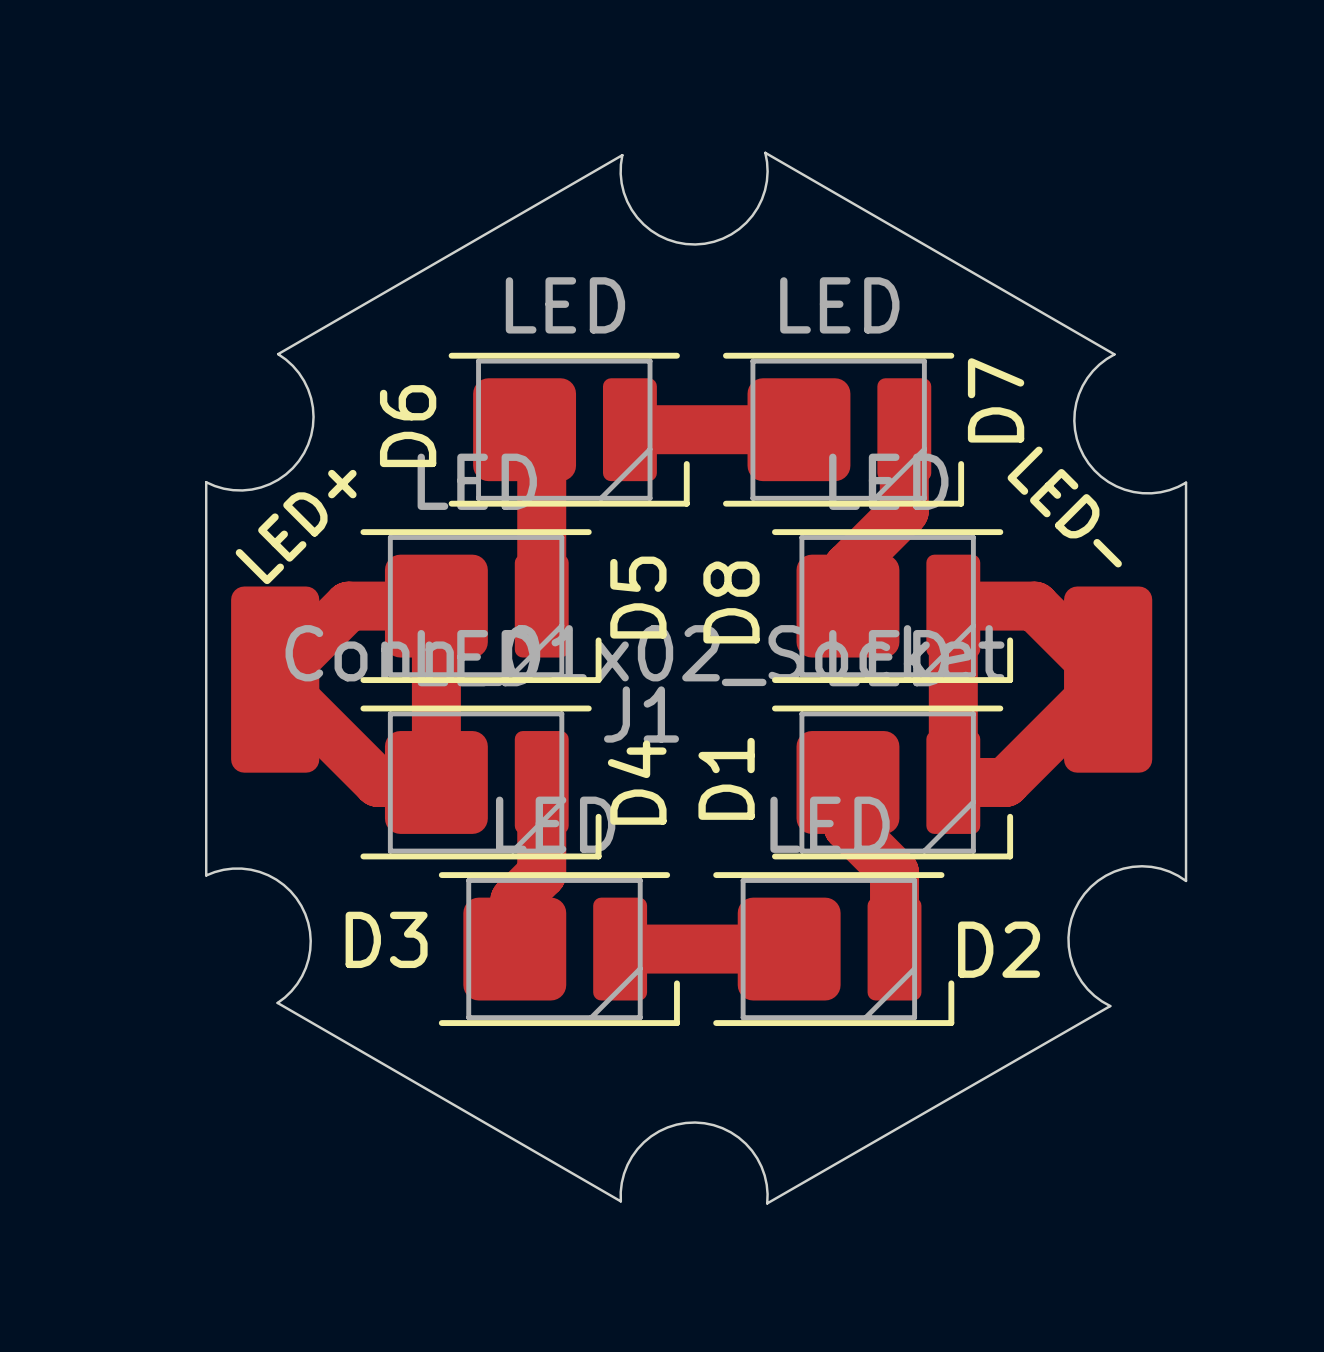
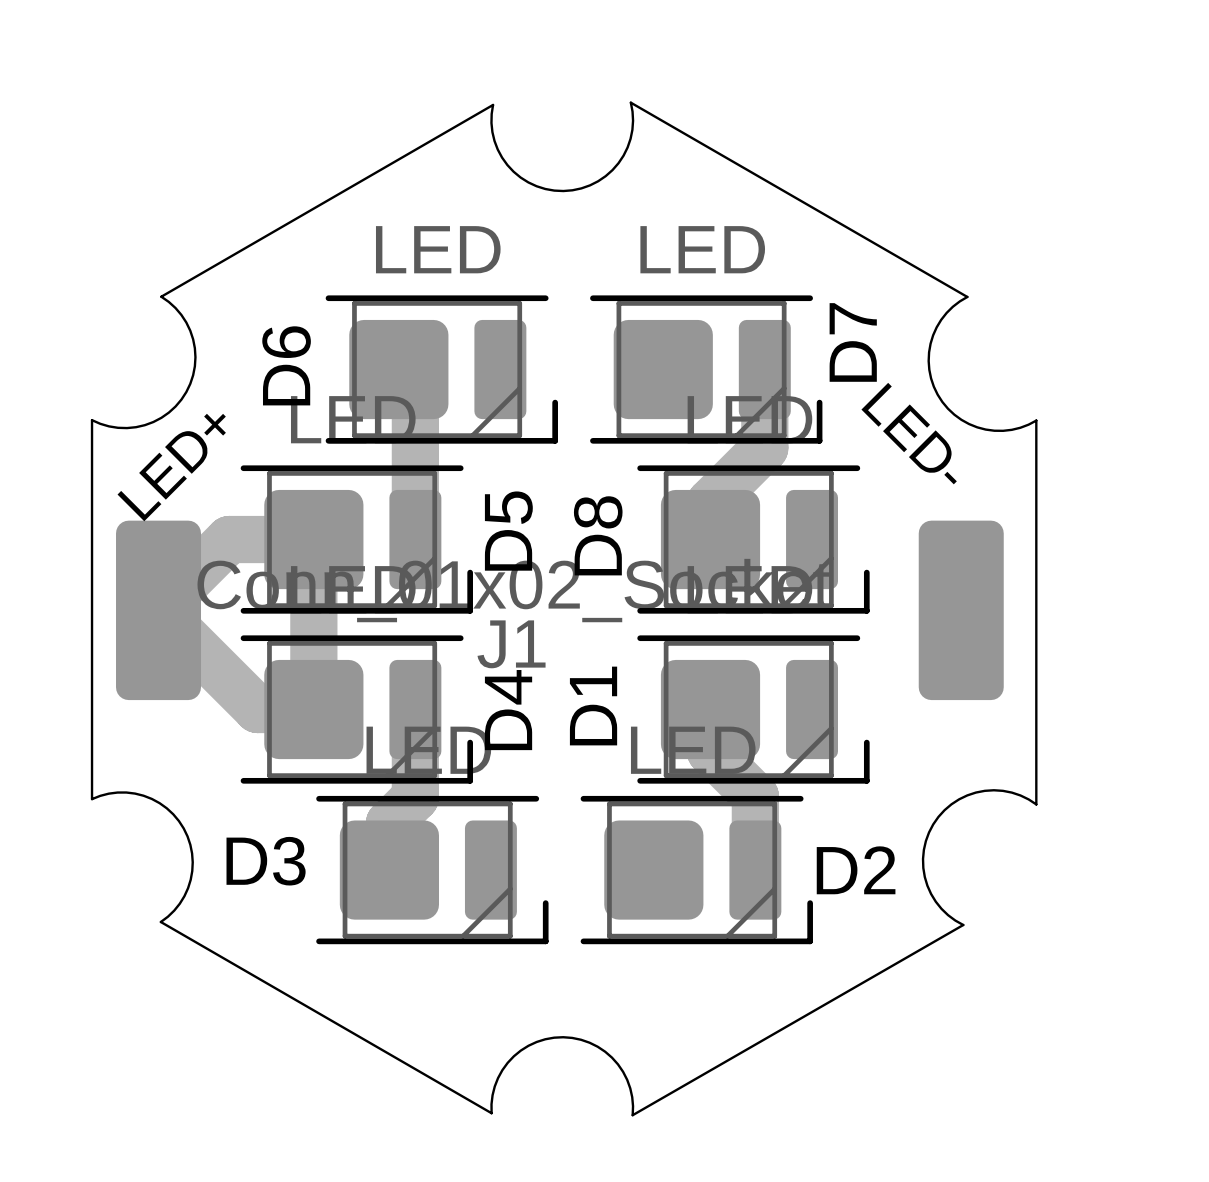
track: (629, 429) (798, 429) -> none
track: (953, 606) (1034, 606) (1108, 679) (1005, 782) (953, 782) (953, 606) -> none
track: (620, 949) (789, 949) -> none

